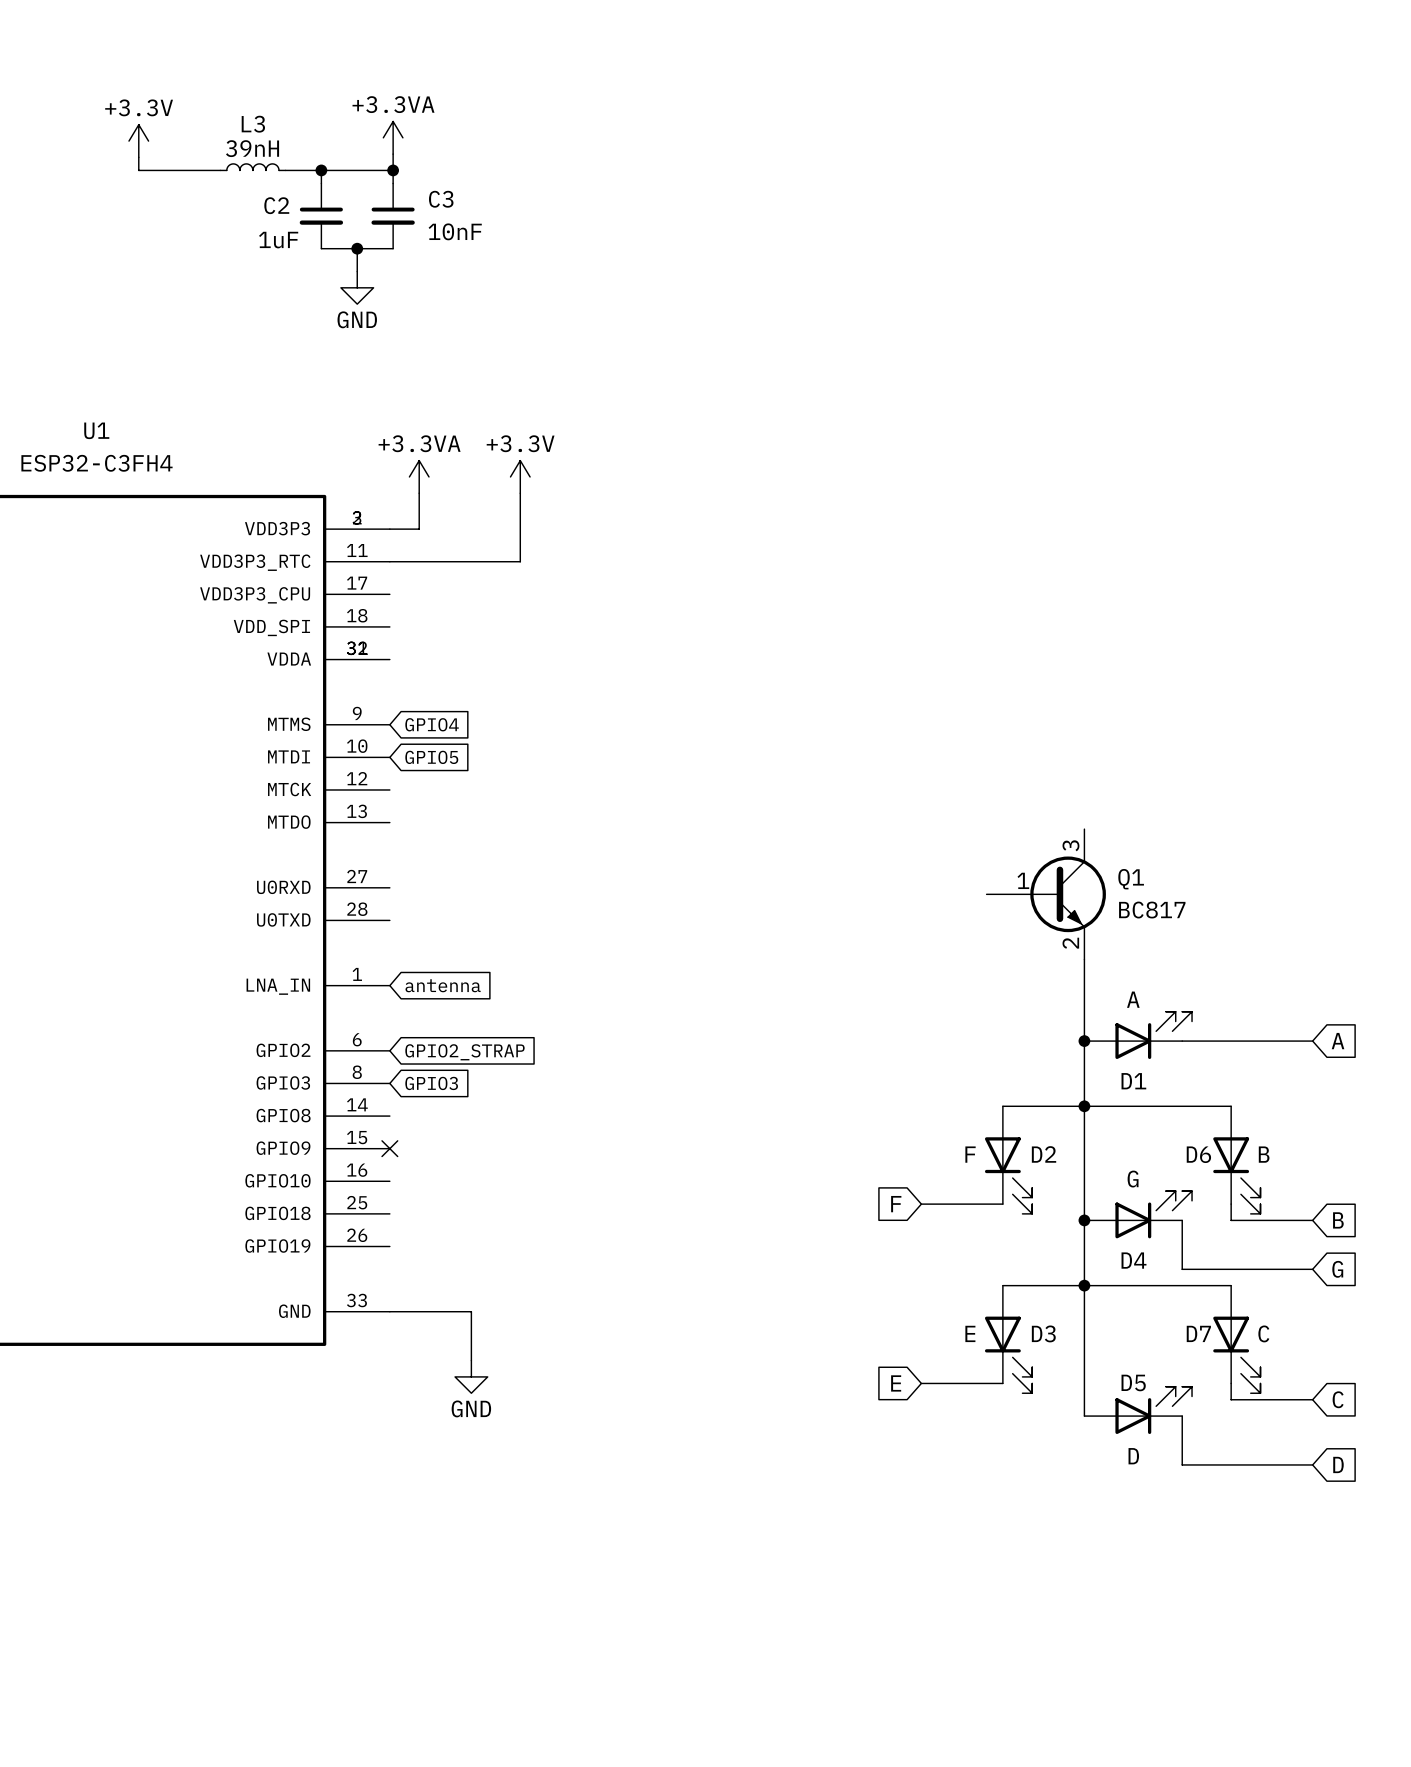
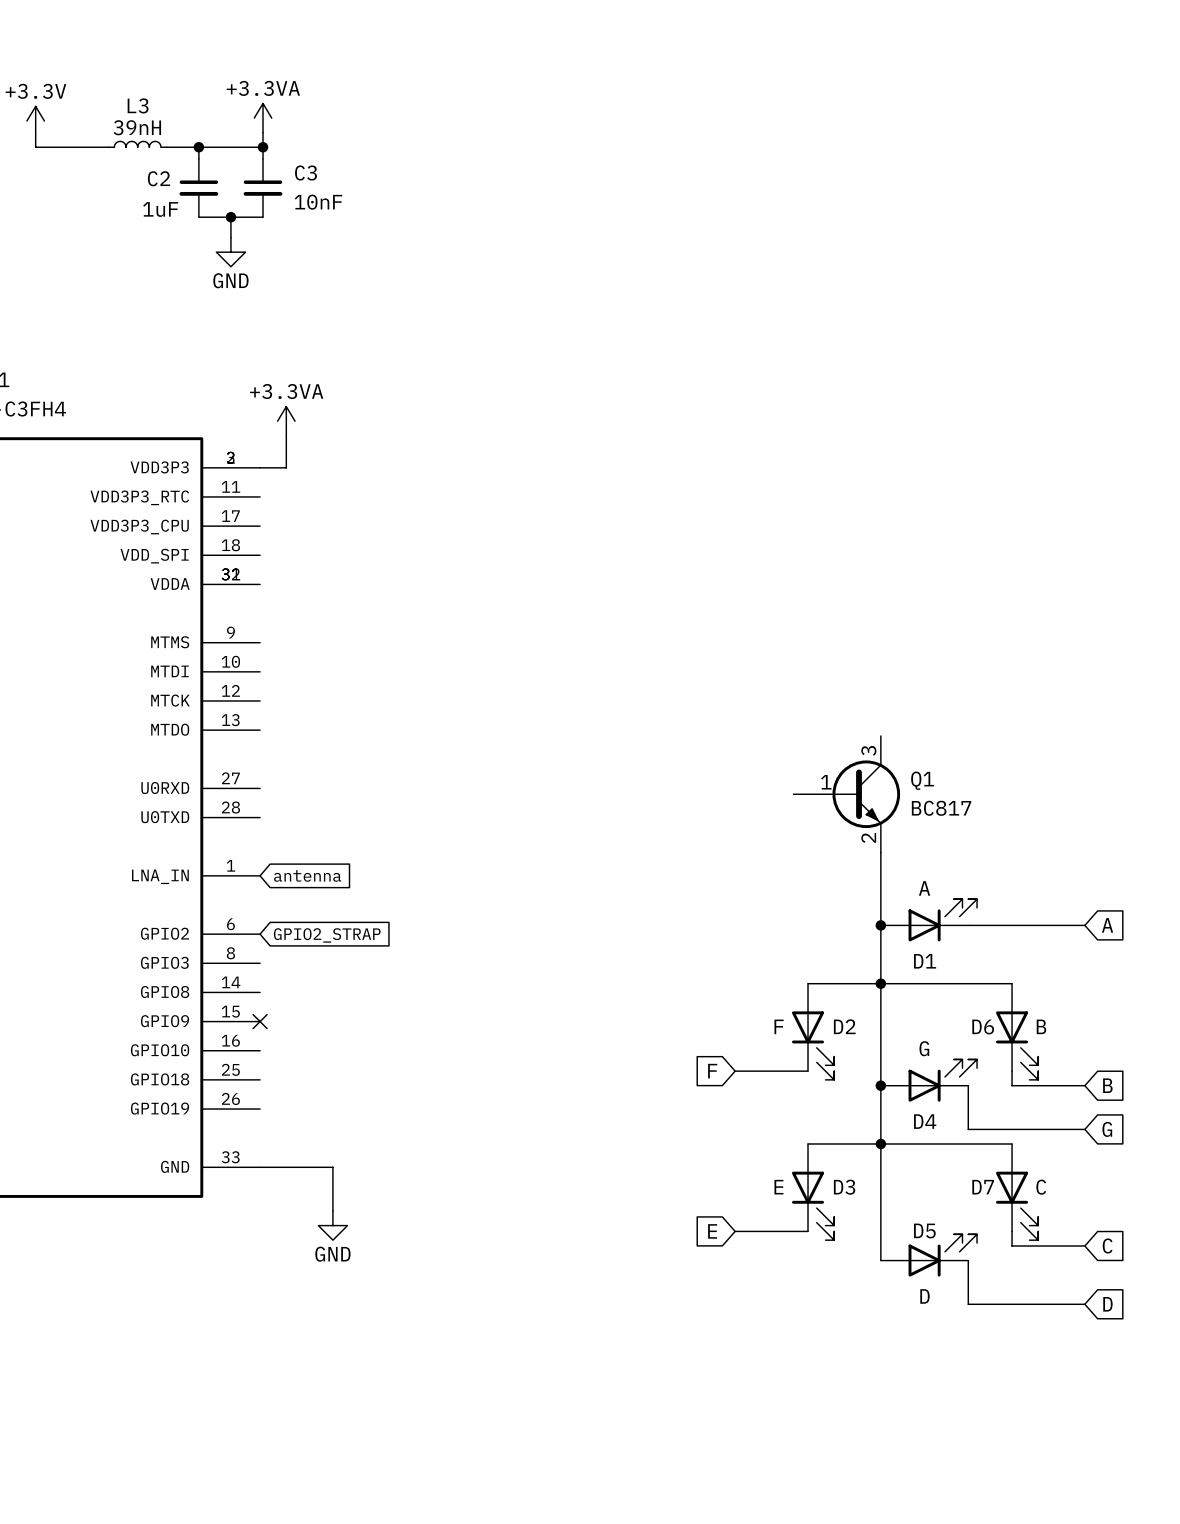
power symbol: +3.3V (520, 476) -> none
wire: (520, 493) (520, 561) (389, 561) -> none
global label: GPIO4 (432, 724) -> none
global label: GPIO5 (431, 757) -> none
global label: GPIO3 (431, 1083) -> none

